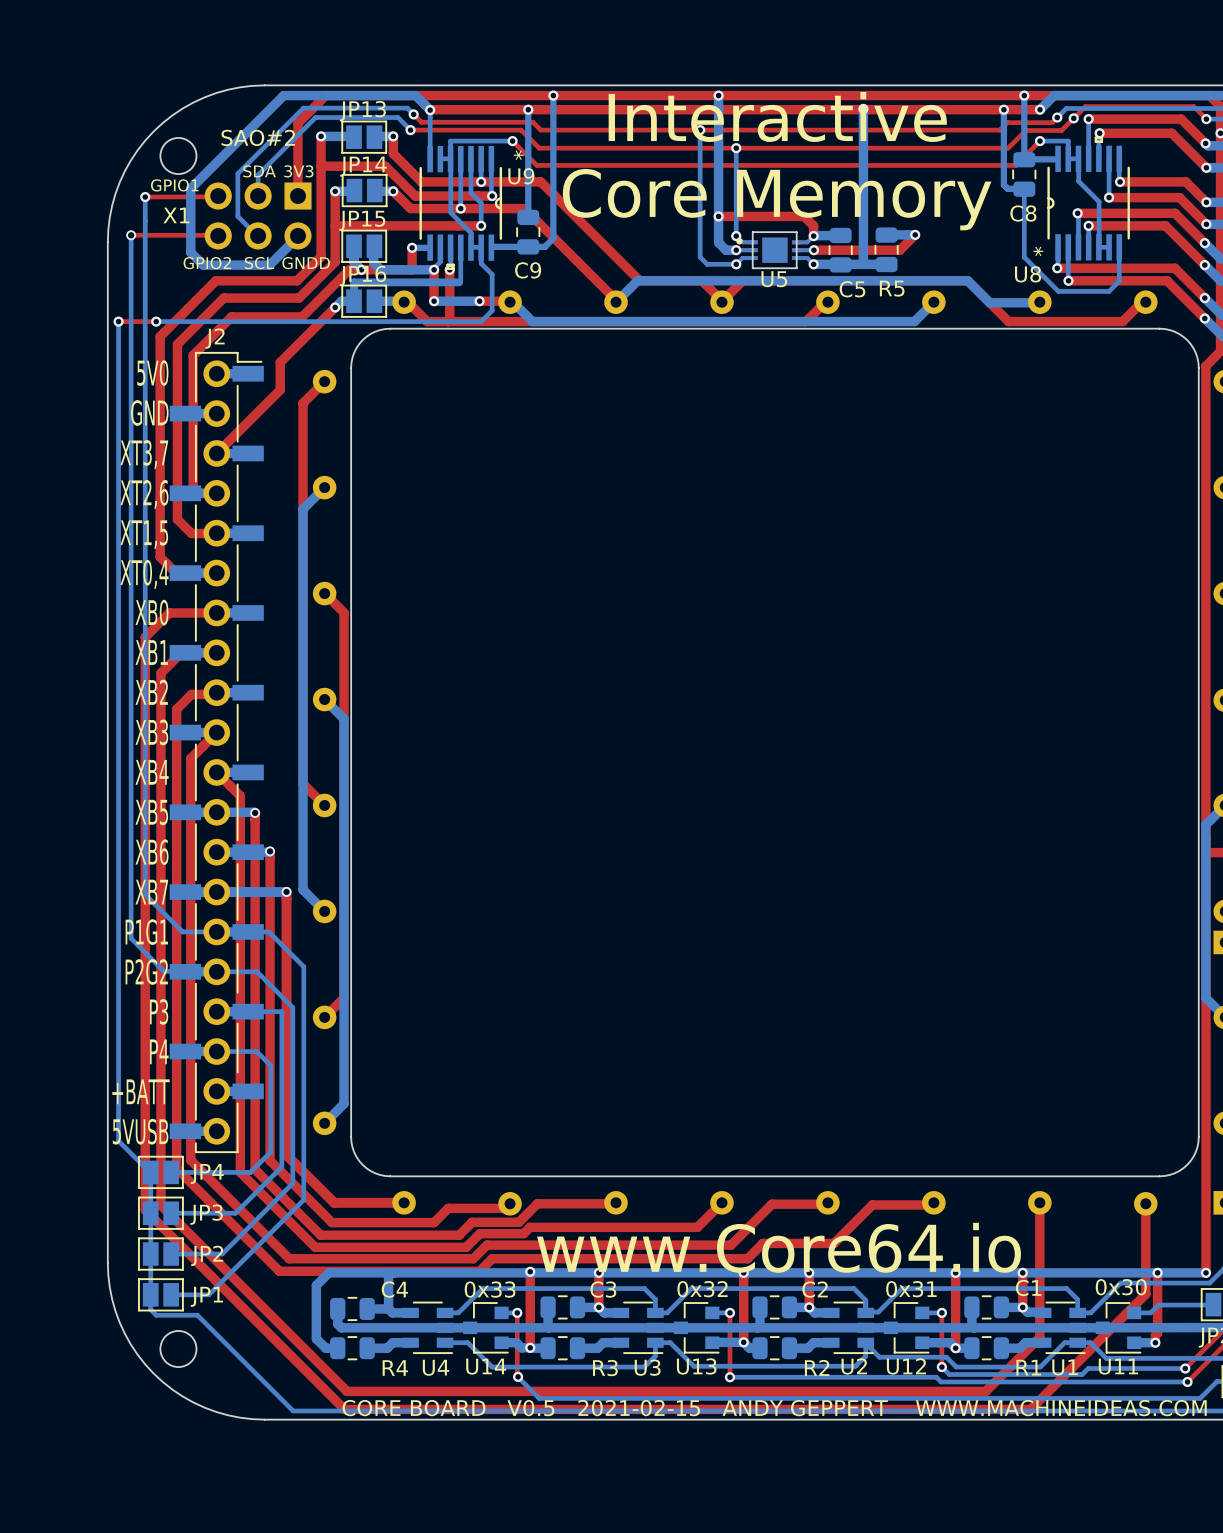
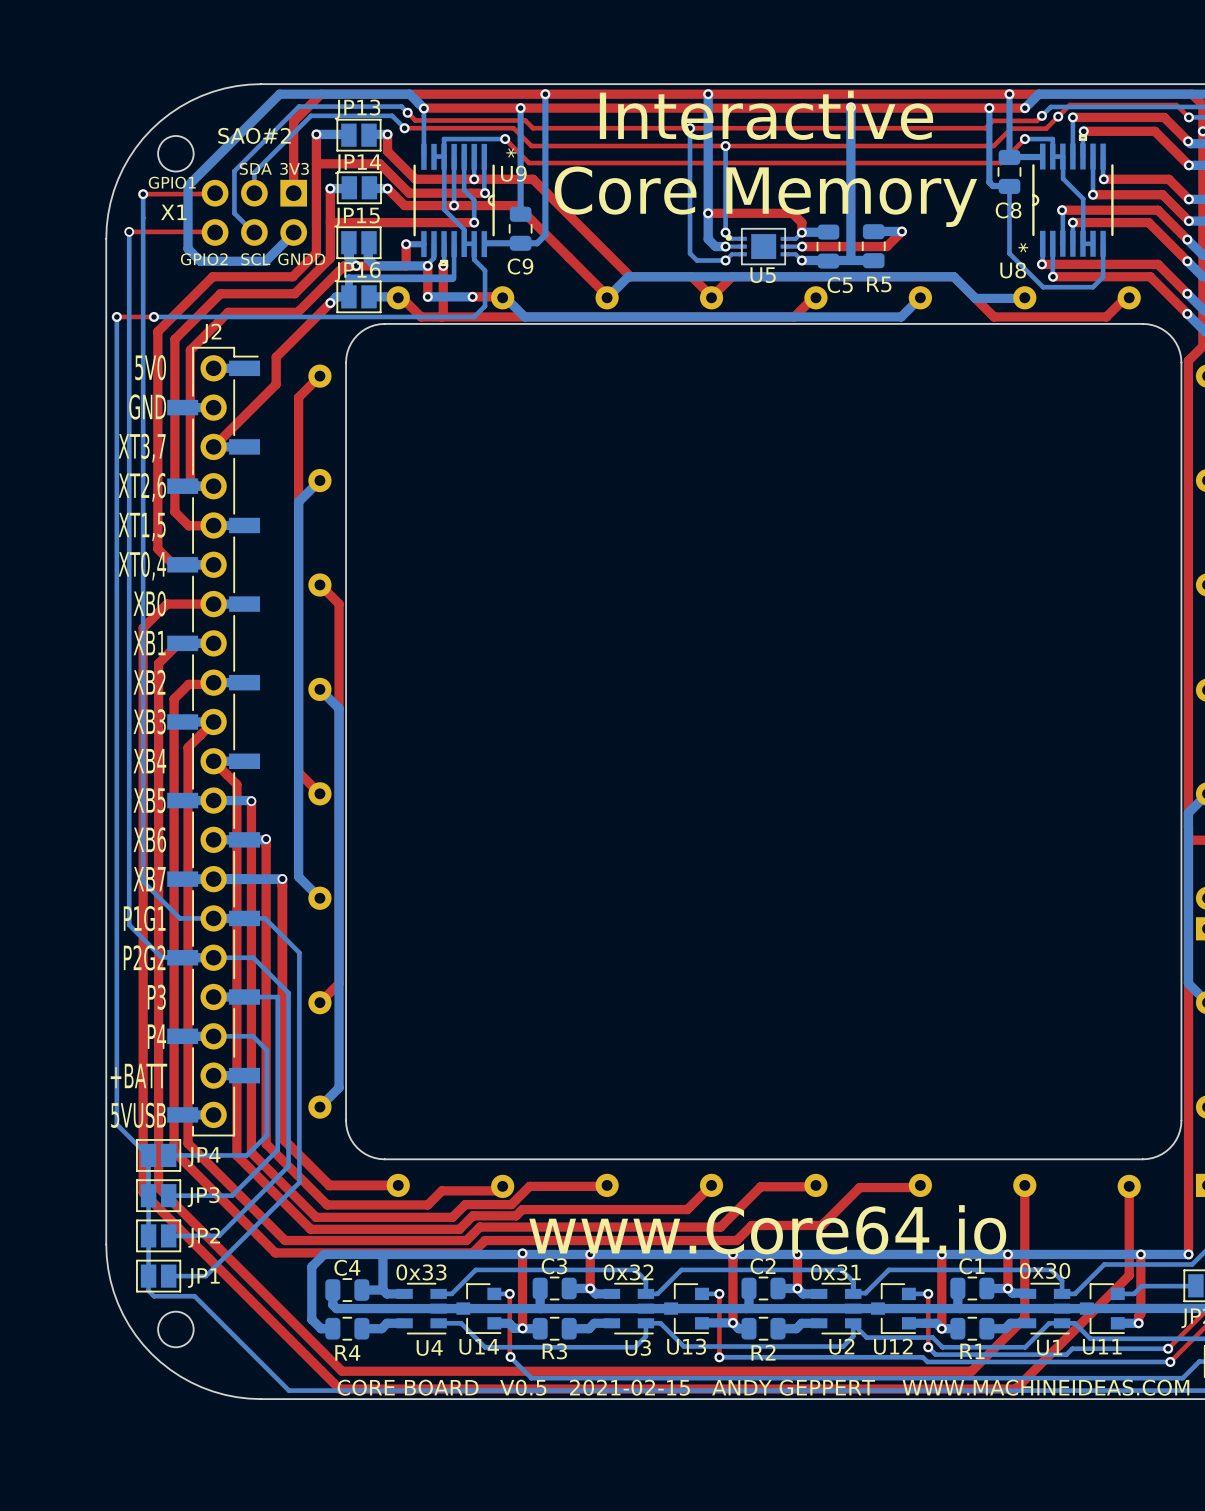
C1 name position: C1 (1028, 1287) -> C1 (971, 1266)
text position: 0x30 (1121, 1287) -> 0x30 (1045, 1270)
C4 name position: C4 (394, 1289) -> C4 (347, 1267)
text position: 0x33 (490, 1289) -> 0x33 (421, 1272)
C3 name position: C3 (603, 1289) -> C3 (554, 1266)
text position: 0x32 (702, 1289) -> 0x32 (628, 1272)
C2 name position: C2 (815, 1289) -> C2 (763, 1266)
text position: 0x31 (911, 1289) -> 0x31 (835, 1272)
R2 name position: R2 (817, 1367) -> R2 (763, 1352)
R1 name position: R1 (1028, 1367) -> R1 (972, 1351)
R4 name position: R4 (395, 1368) -> R4 (347, 1352)
R3 name position: R3 (605, 1368) -> R3 (554, 1351)

